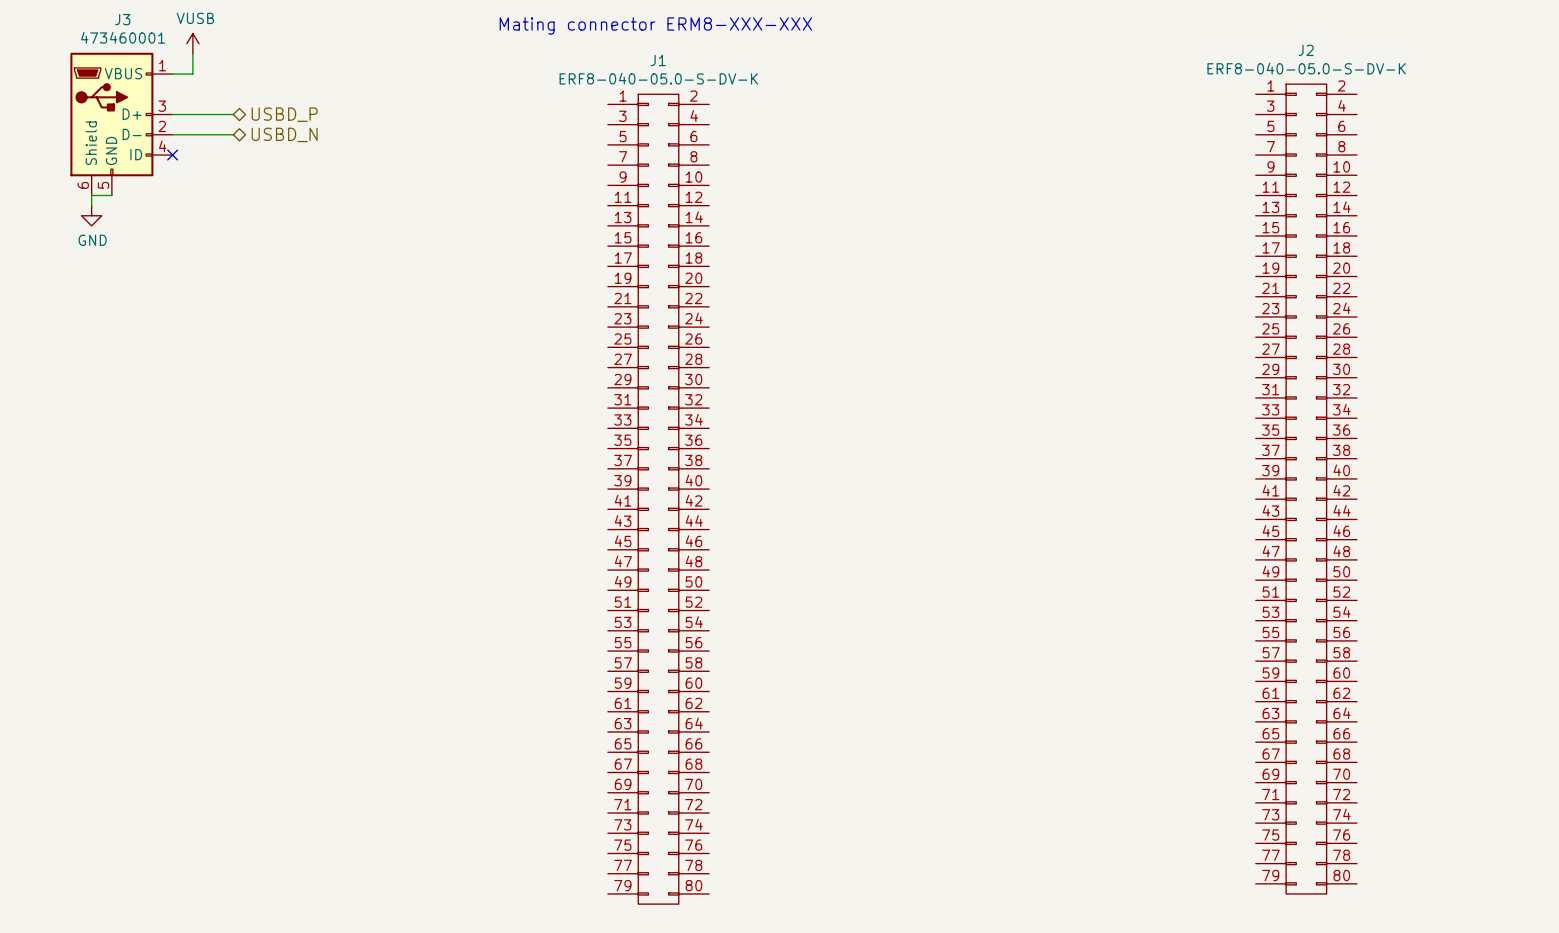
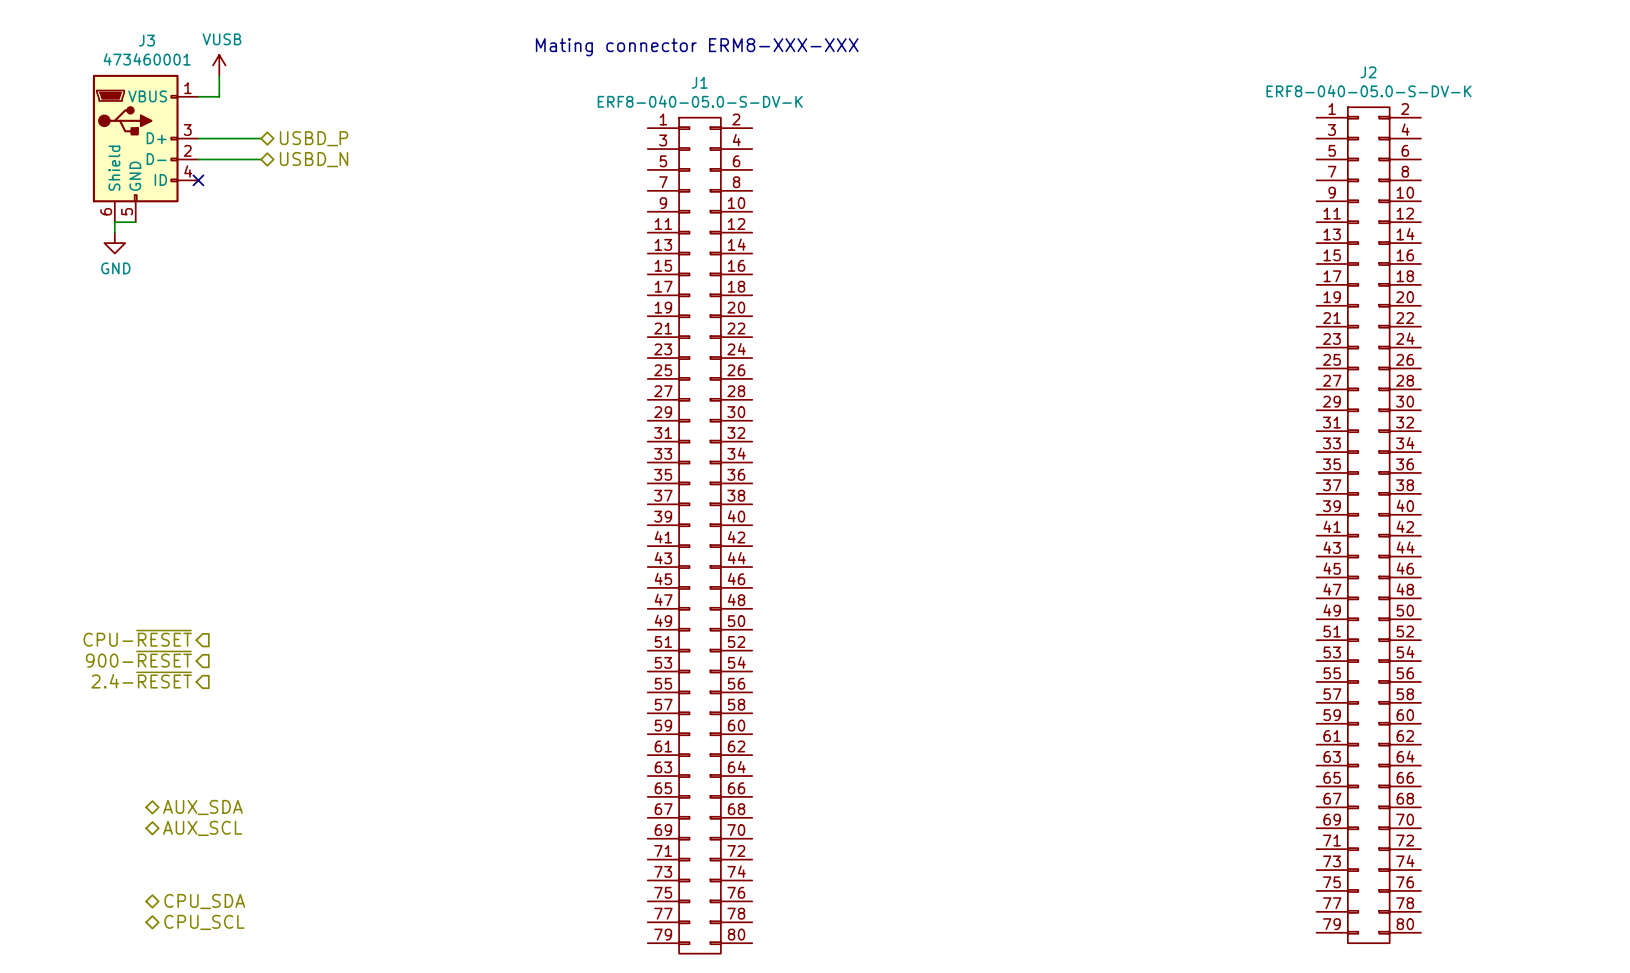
hierarchical label: none -> CPU-~{RESET} (137, 638)
hierarchical label: none -> 900-~{RESET} (138, 659)
hierarchical label: none -> 2.4-~{RESET} (141, 680)
hierarchical label: none -> AUX_SDA (202, 807)
hierarchical label: none -> AUX_SCL (202, 828)
hierarchical label: none -> CPU_SDA (204, 901)
hierarchical label: none -> CPU_SCL (204, 922)

